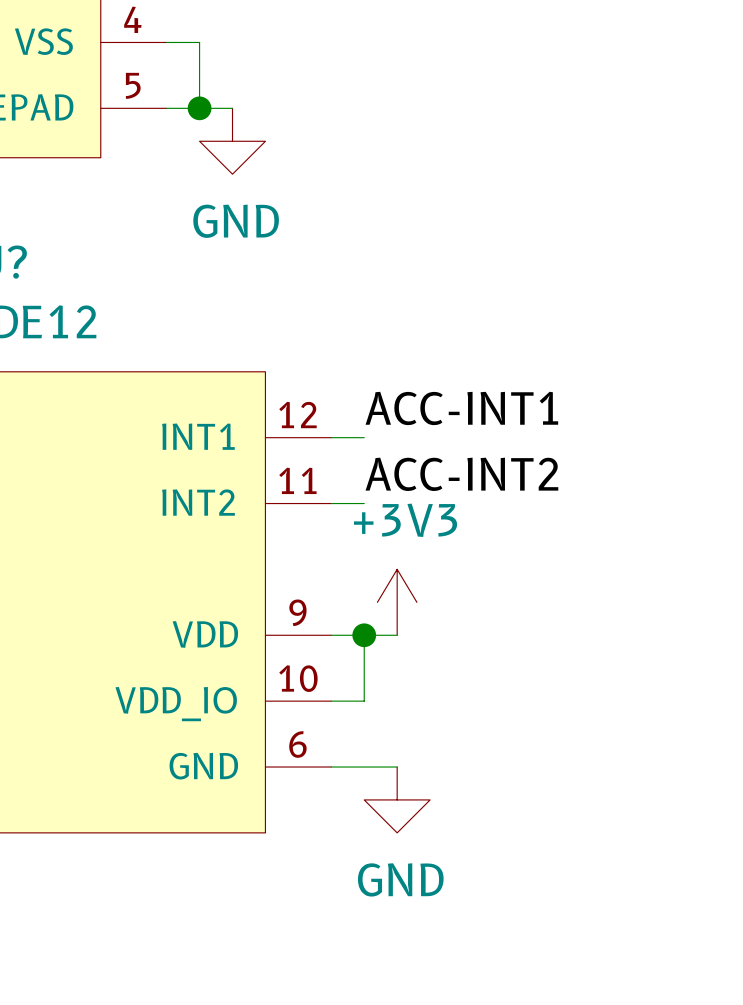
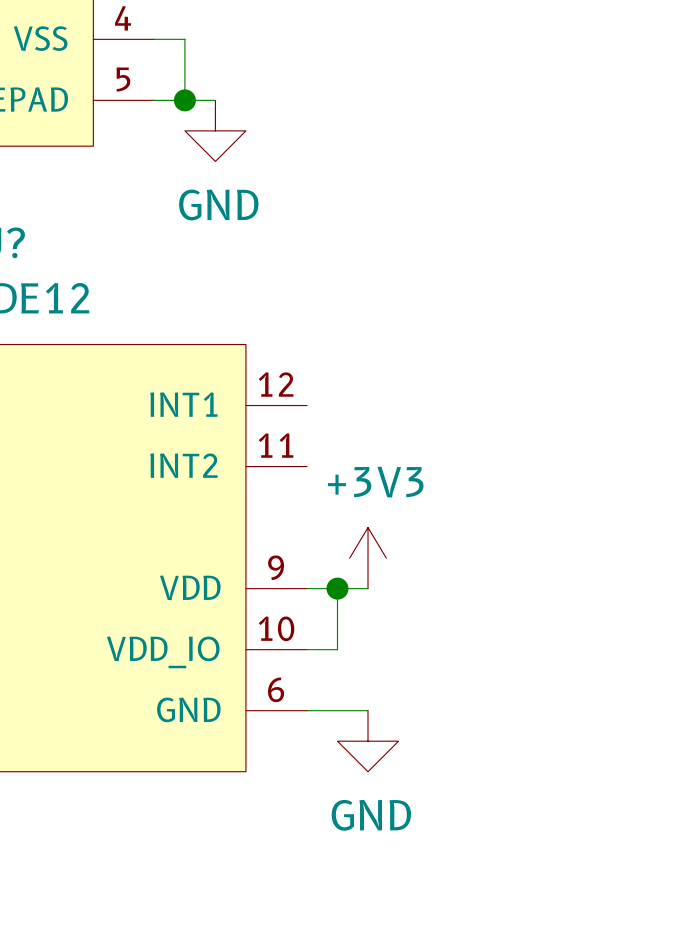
label: ACC-INT1 (461, 408) -> none
wire: (331, 437) (364, 437) -> none
label: ACC-INT2 (461, 474) -> none
wire: (331, 503) (364, 503) -> none

